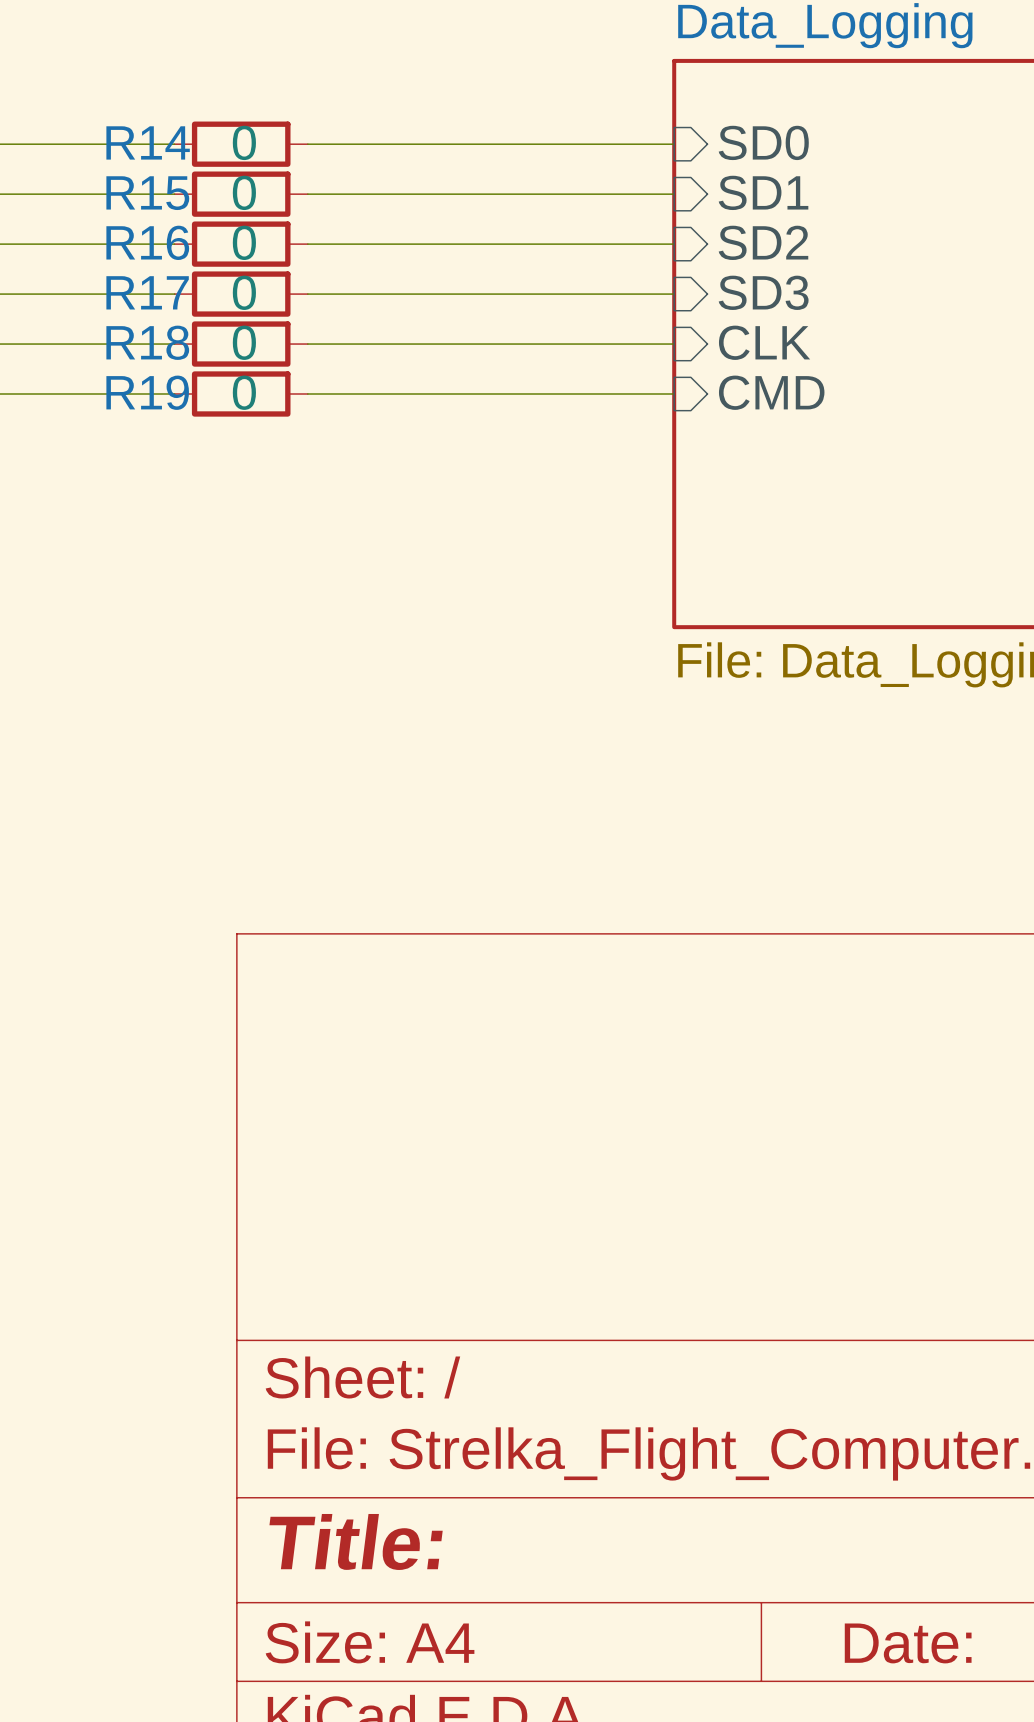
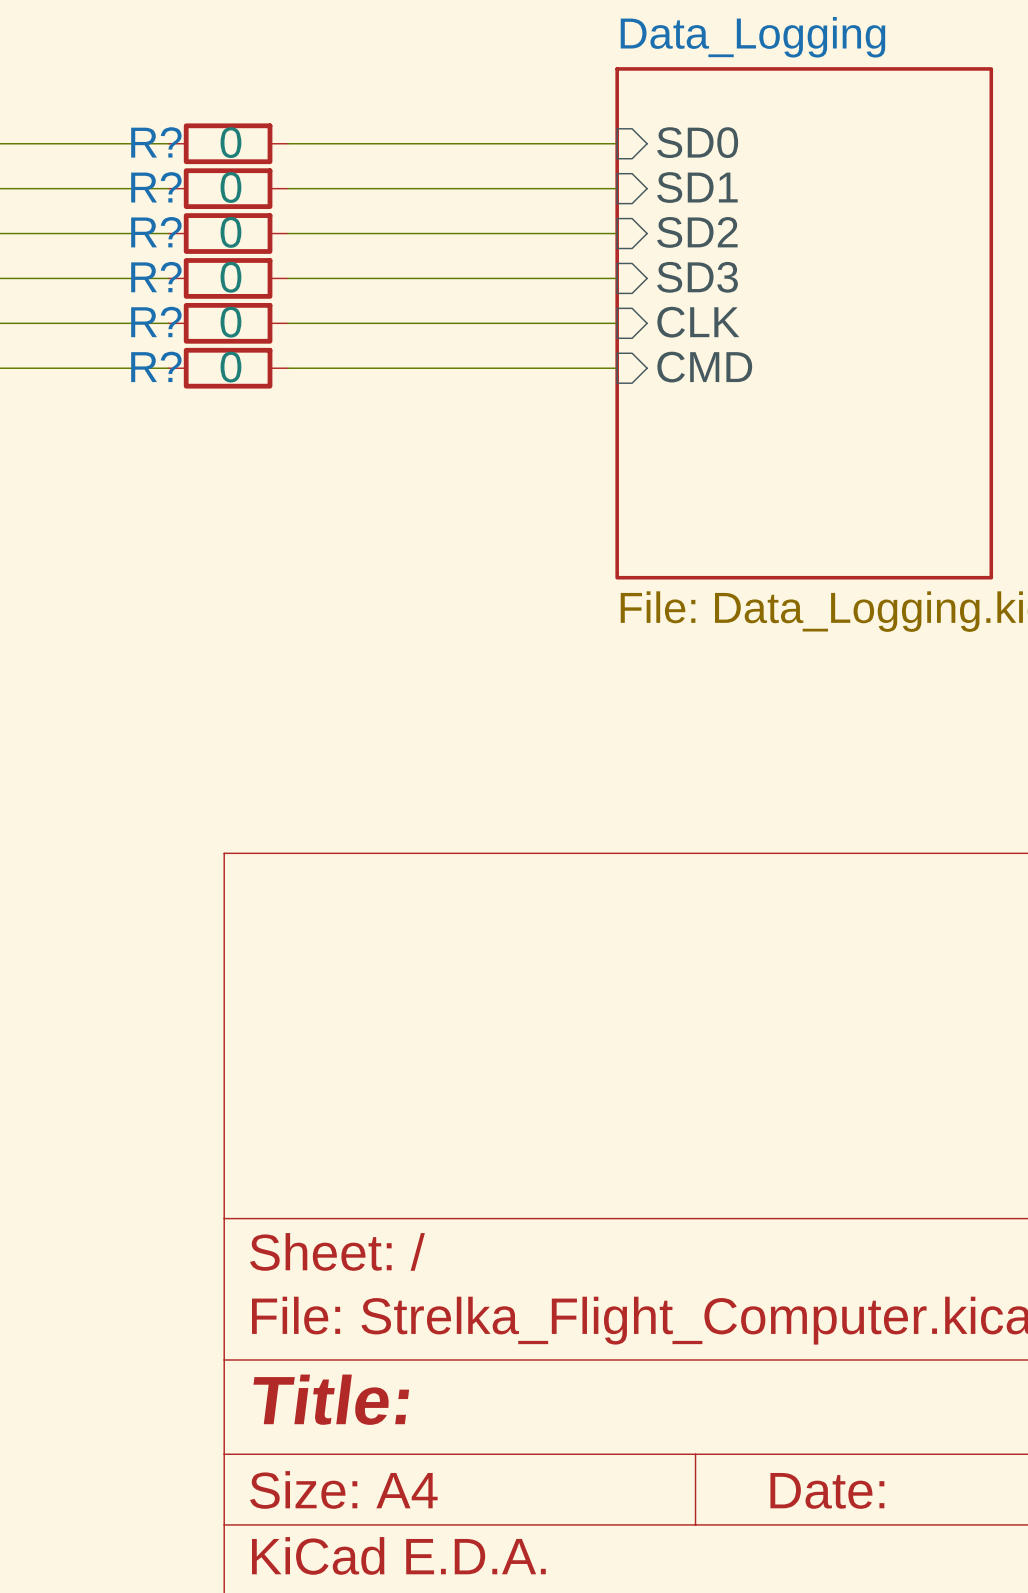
R14 name: R14 (148, 142) -> R? (156, 142)
R15 name: R15 (147, 193) -> R? (156, 187)
R16 name: R16 (147, 242) -> R? (156, 232)
R17 name: R17 (147, 292) -> R? (156, 277)
R18 name: R18 (147, 342) -> R? (156, 321)
R19 name: R19 (147, 392) -> R? (156, 366)

